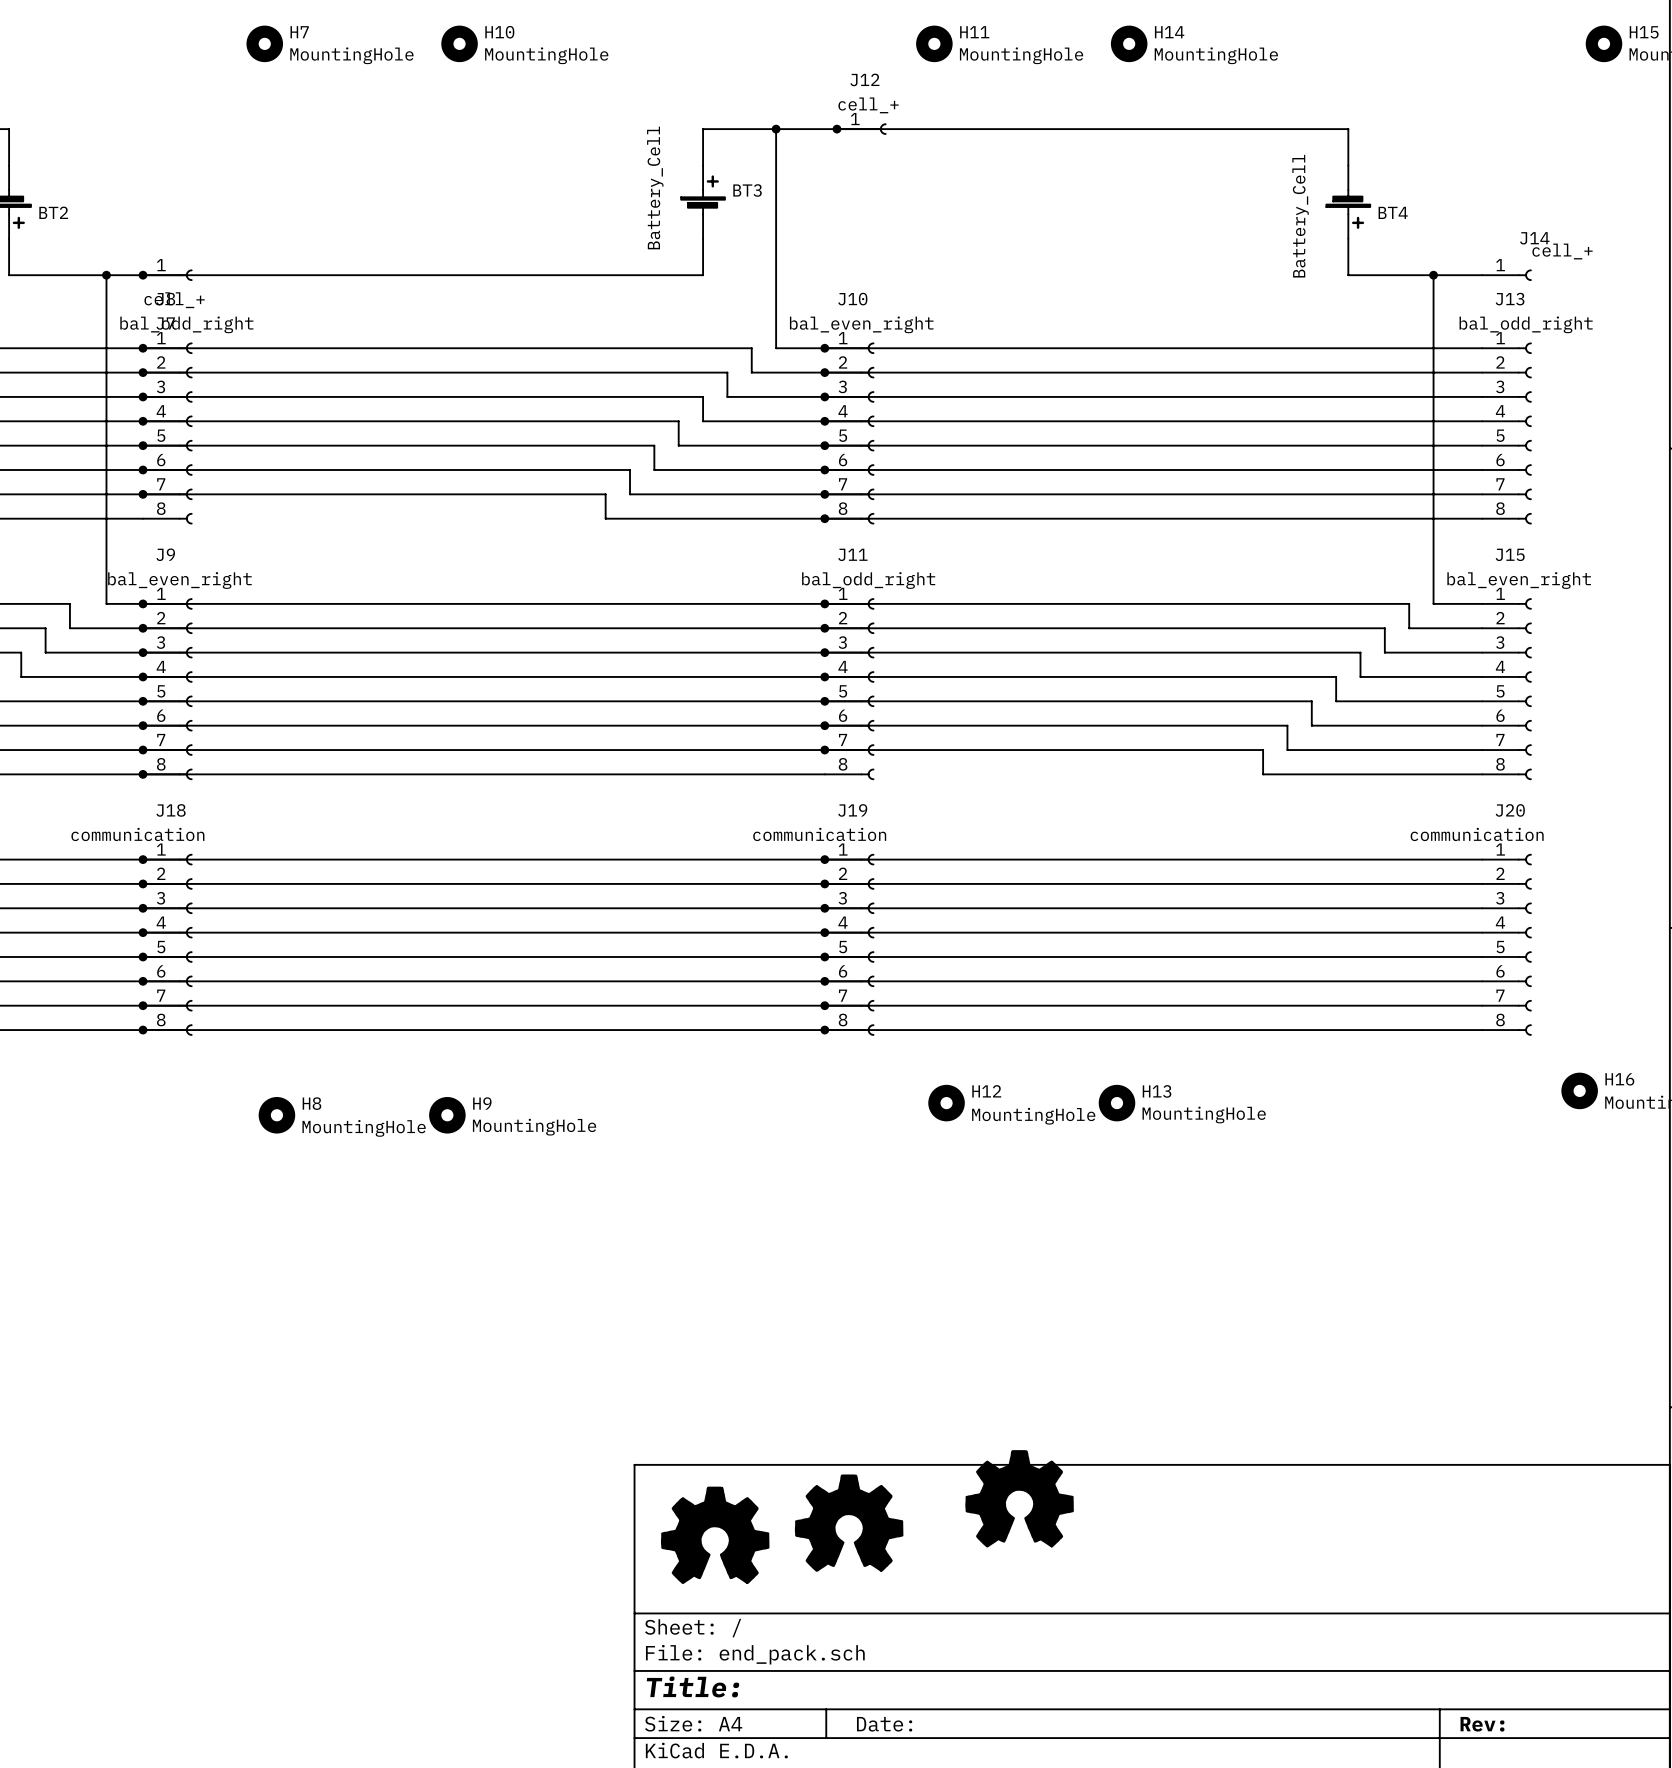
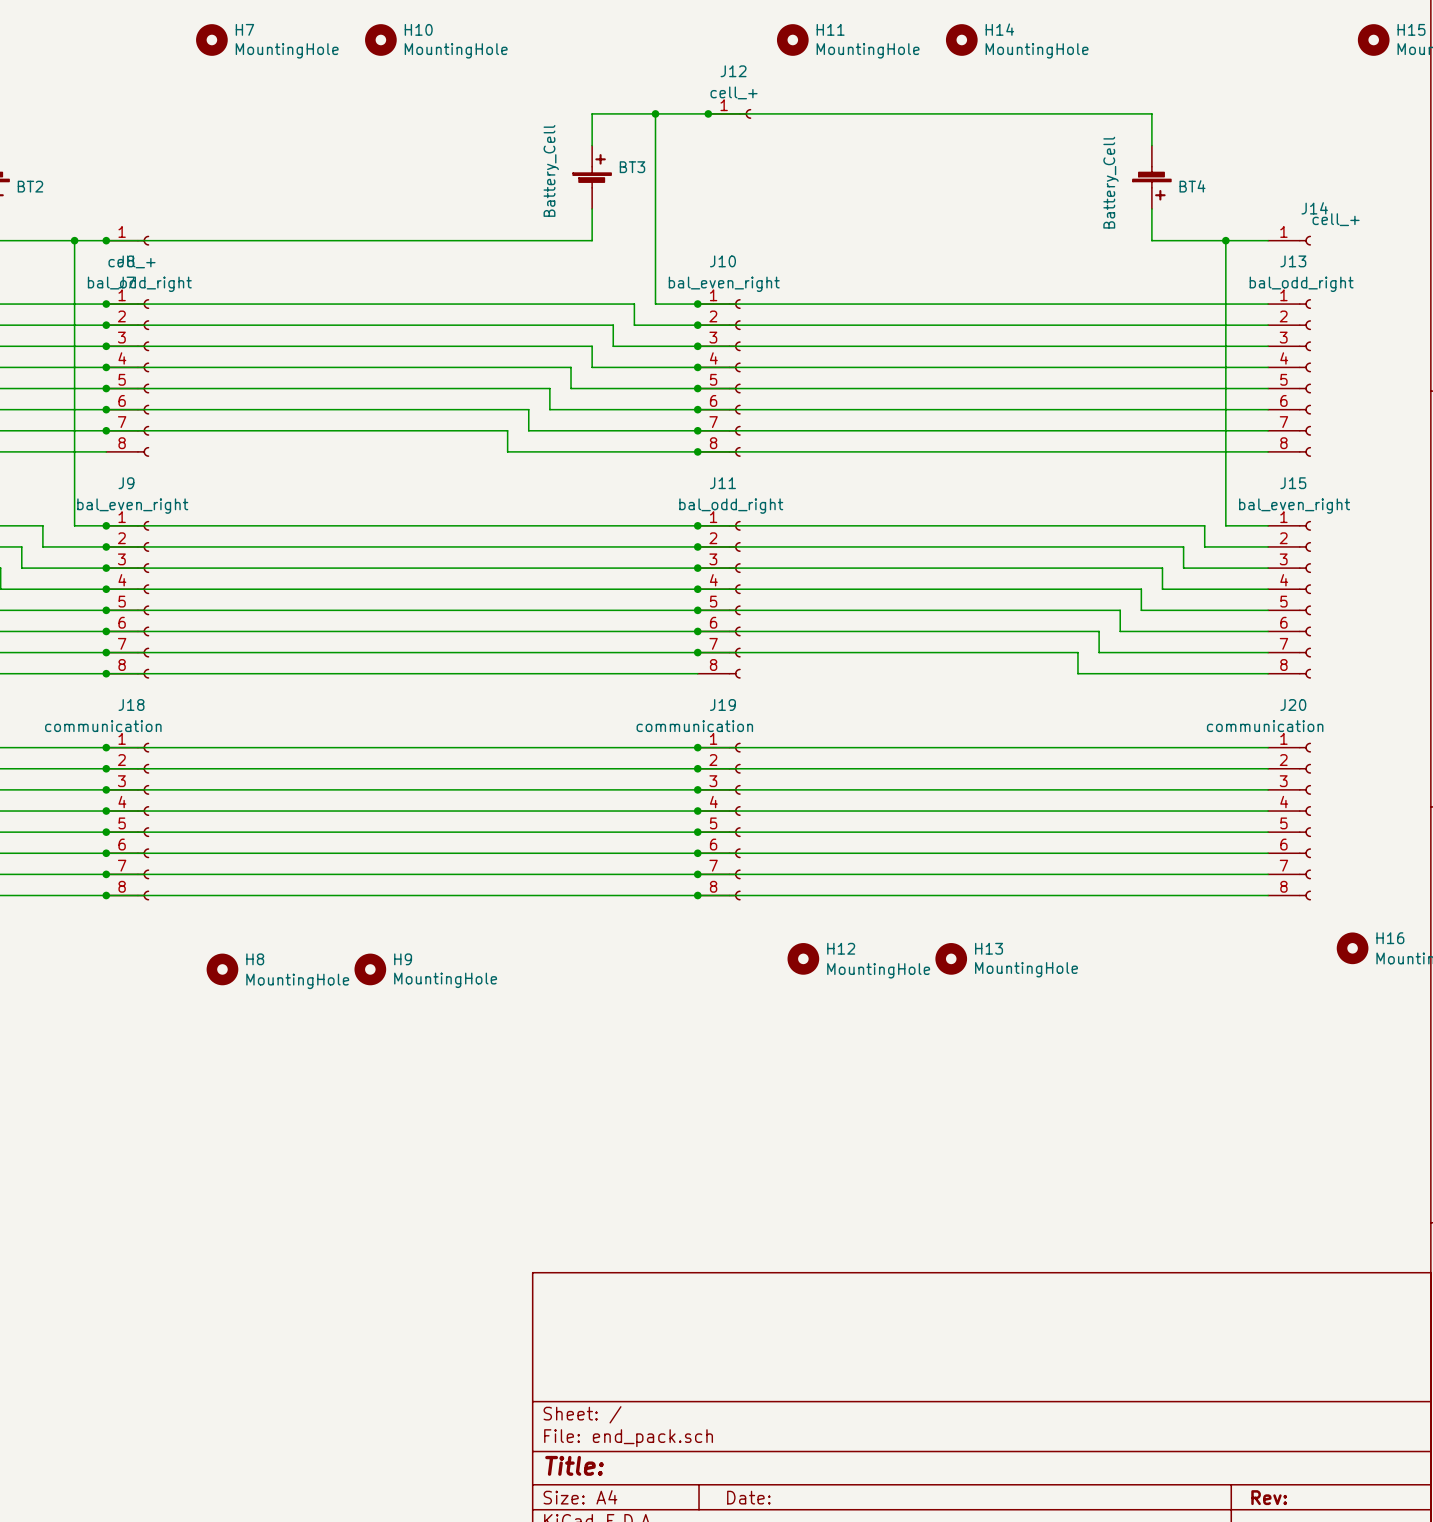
part: (1019, 1498) -> none
part: (849, 1523) -> none
part: (715, 1535) -> none

